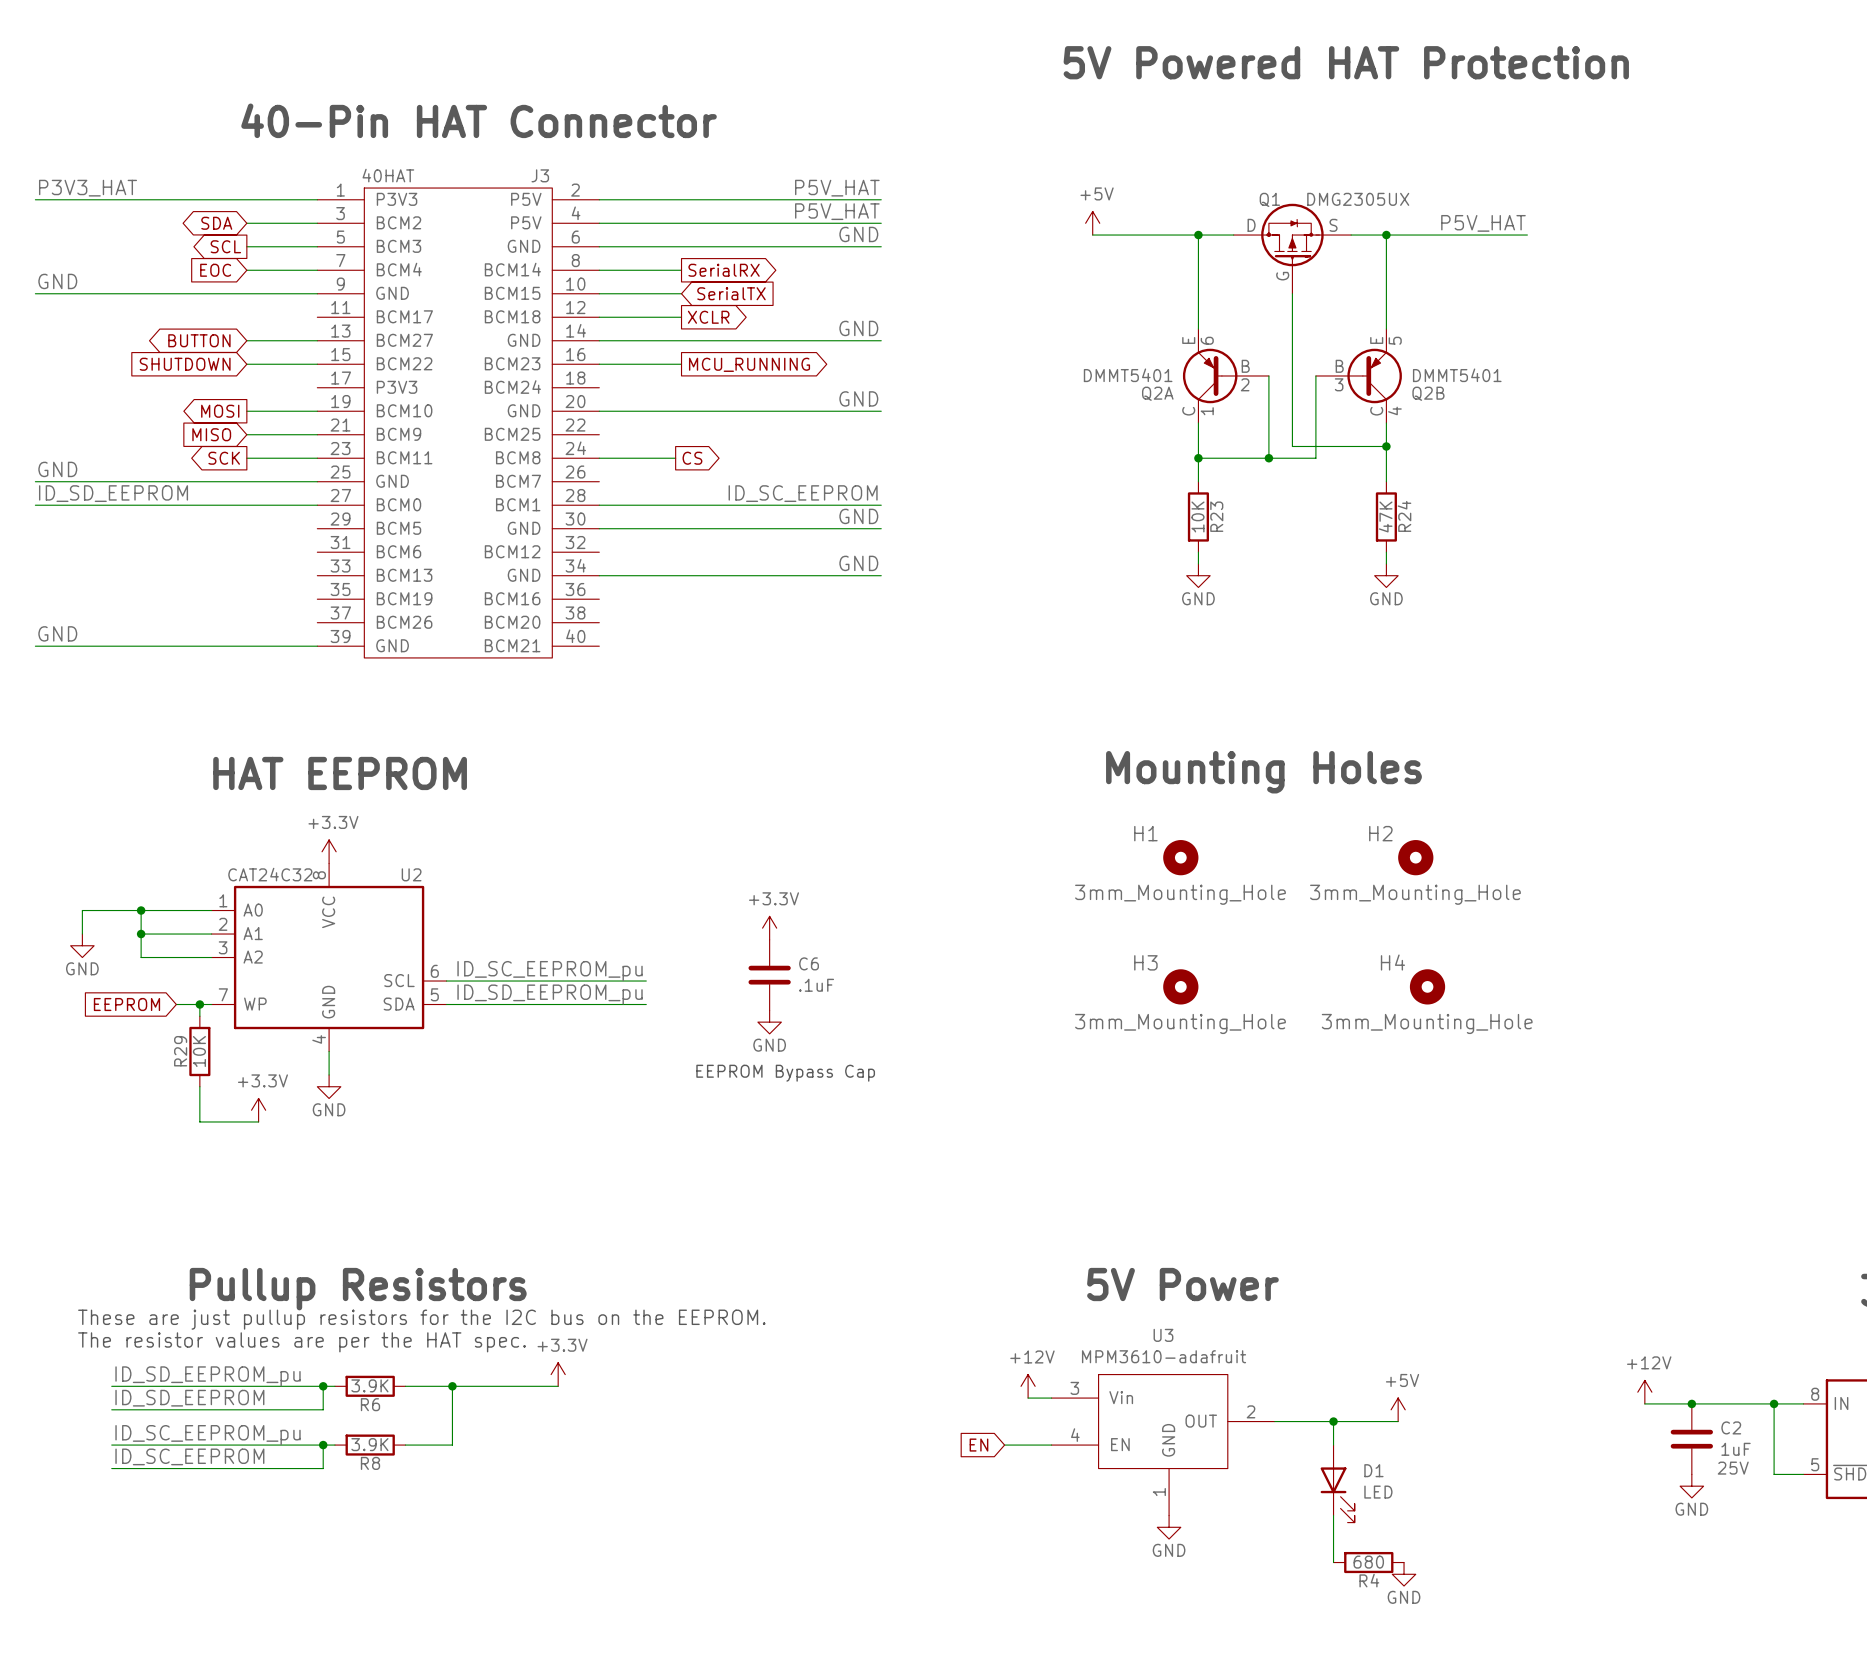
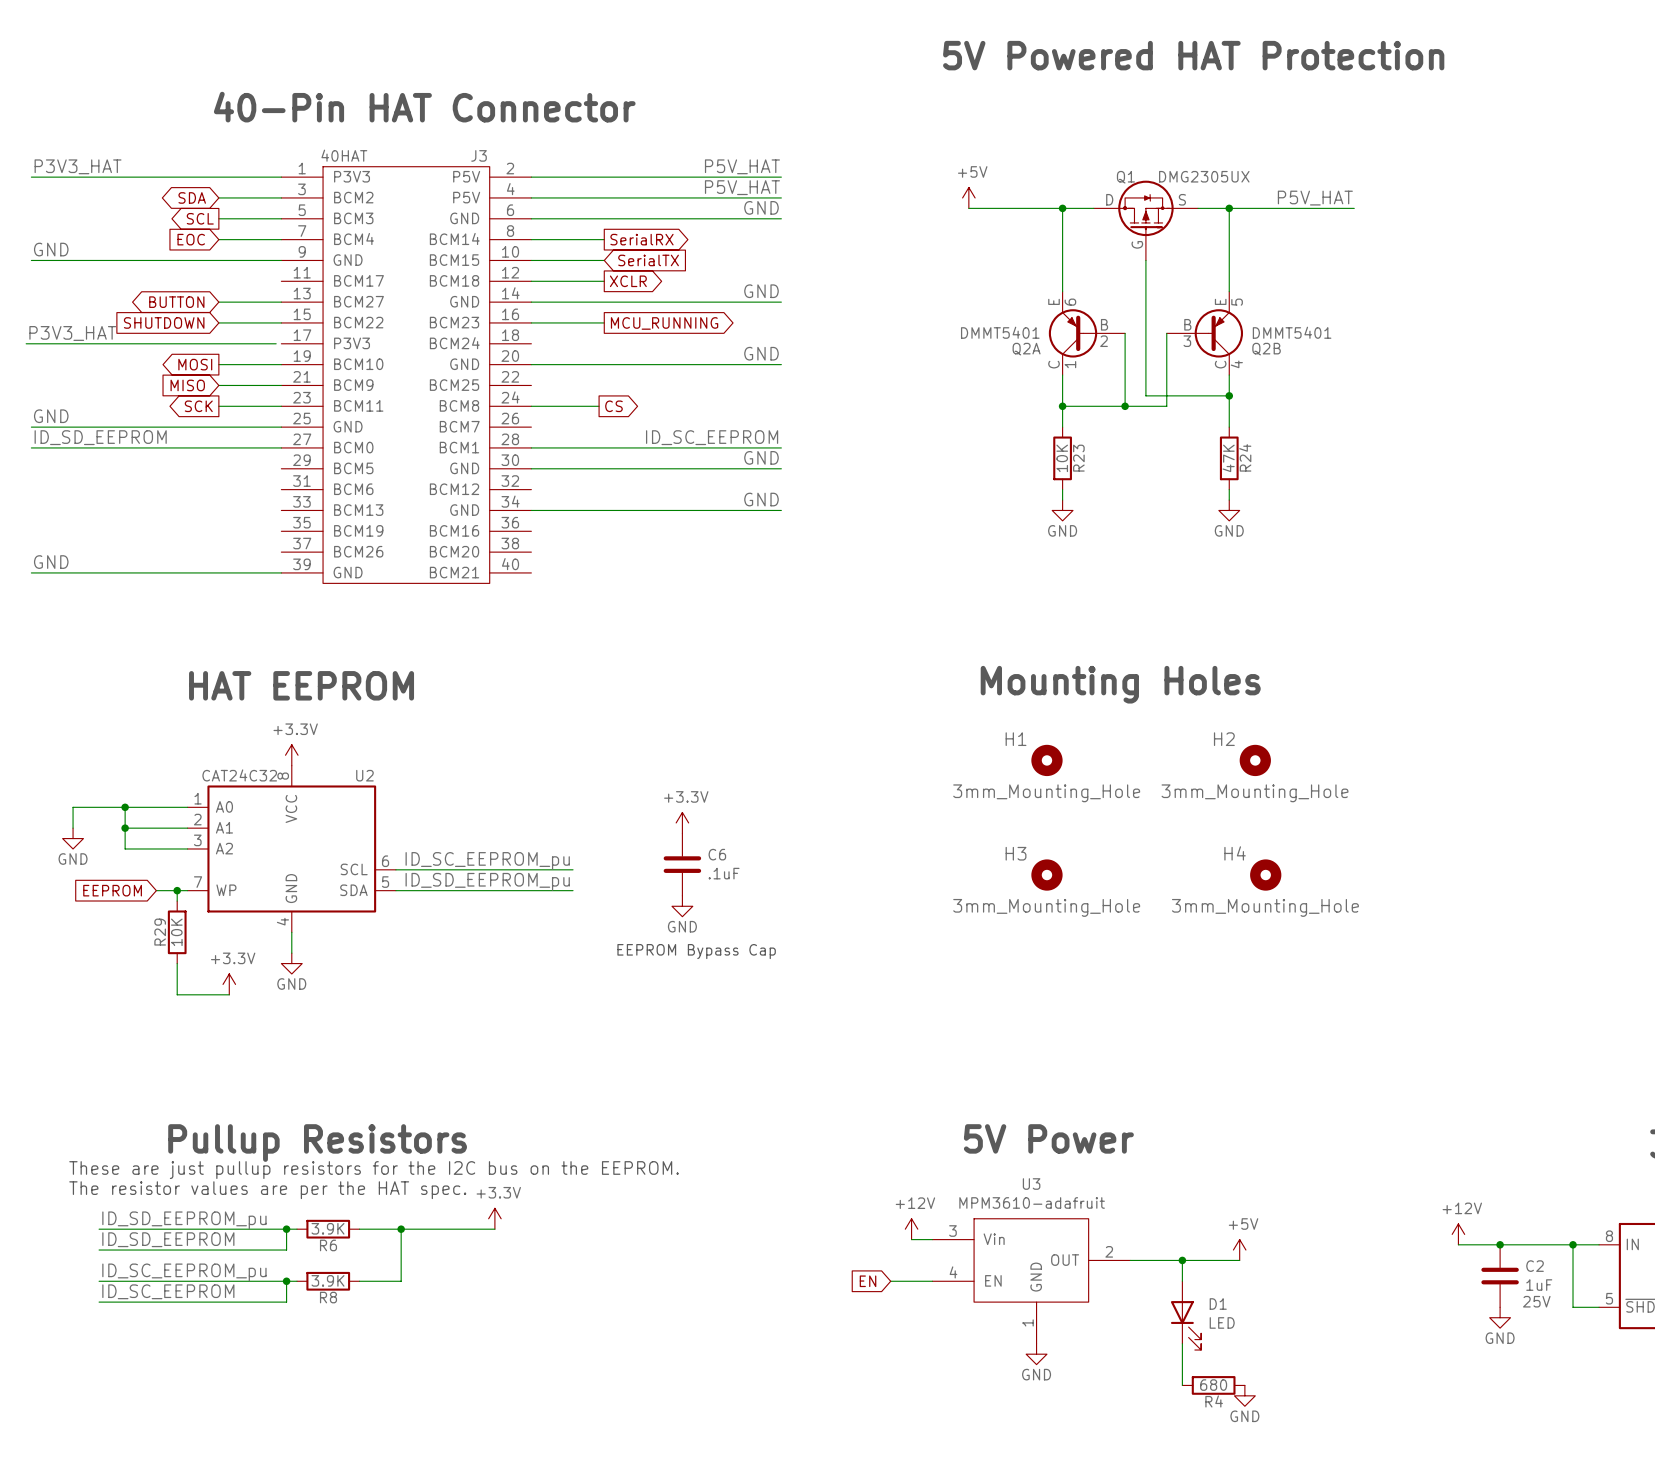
label: none -> P3V3_HAT (72, 333)
wire: none -> (26, 343) (276, 343)

